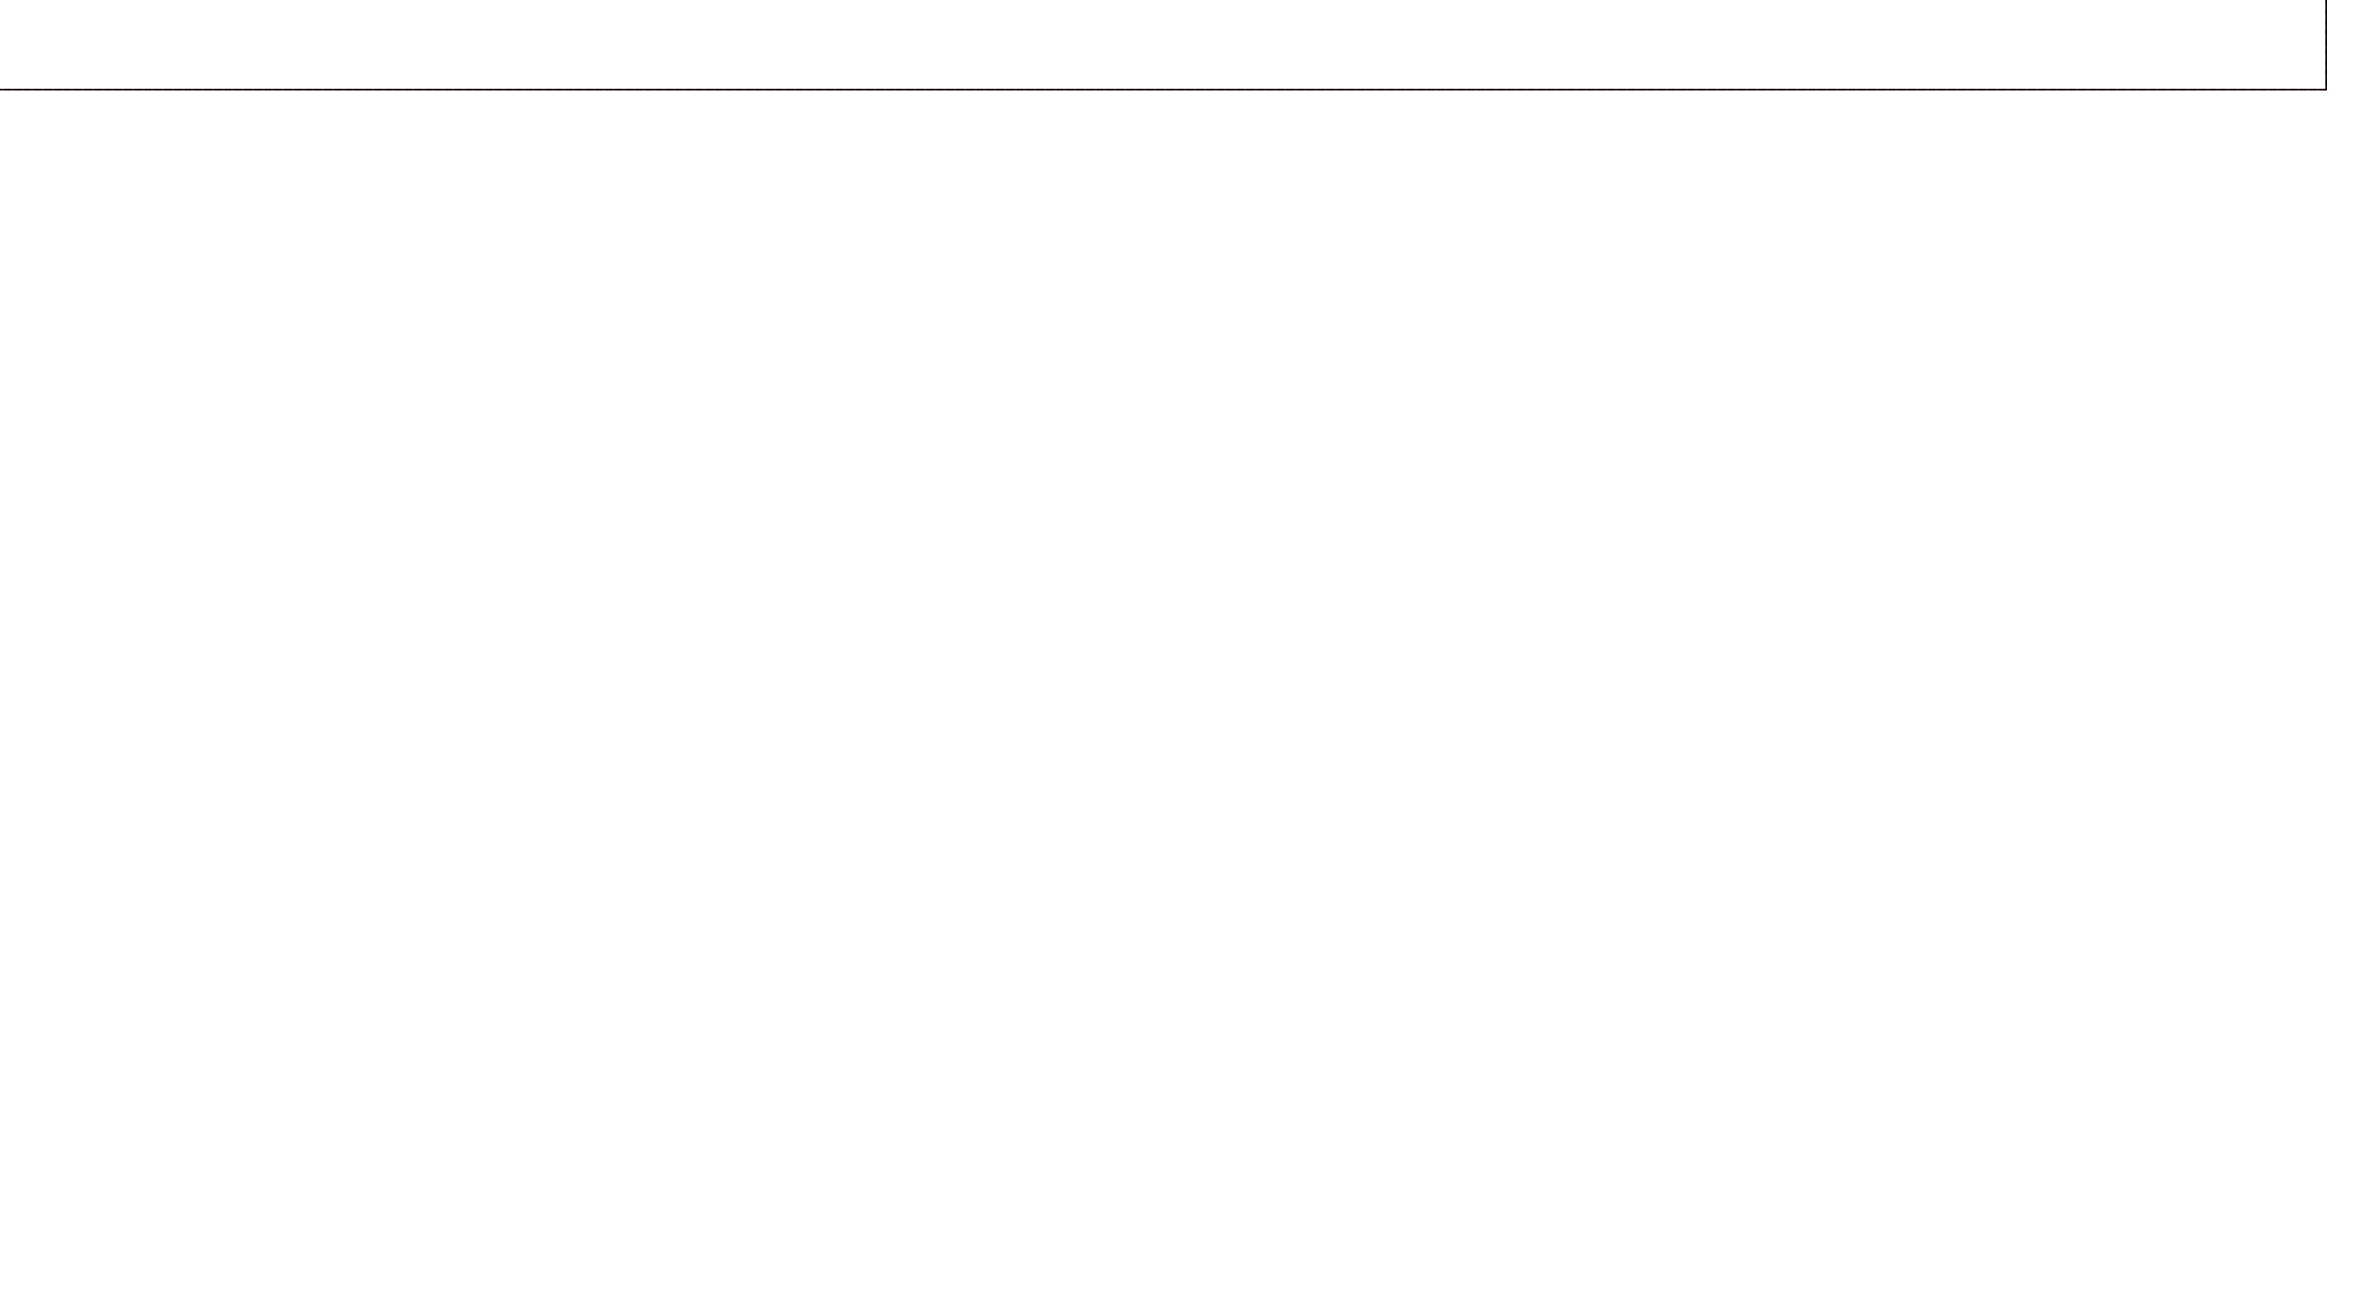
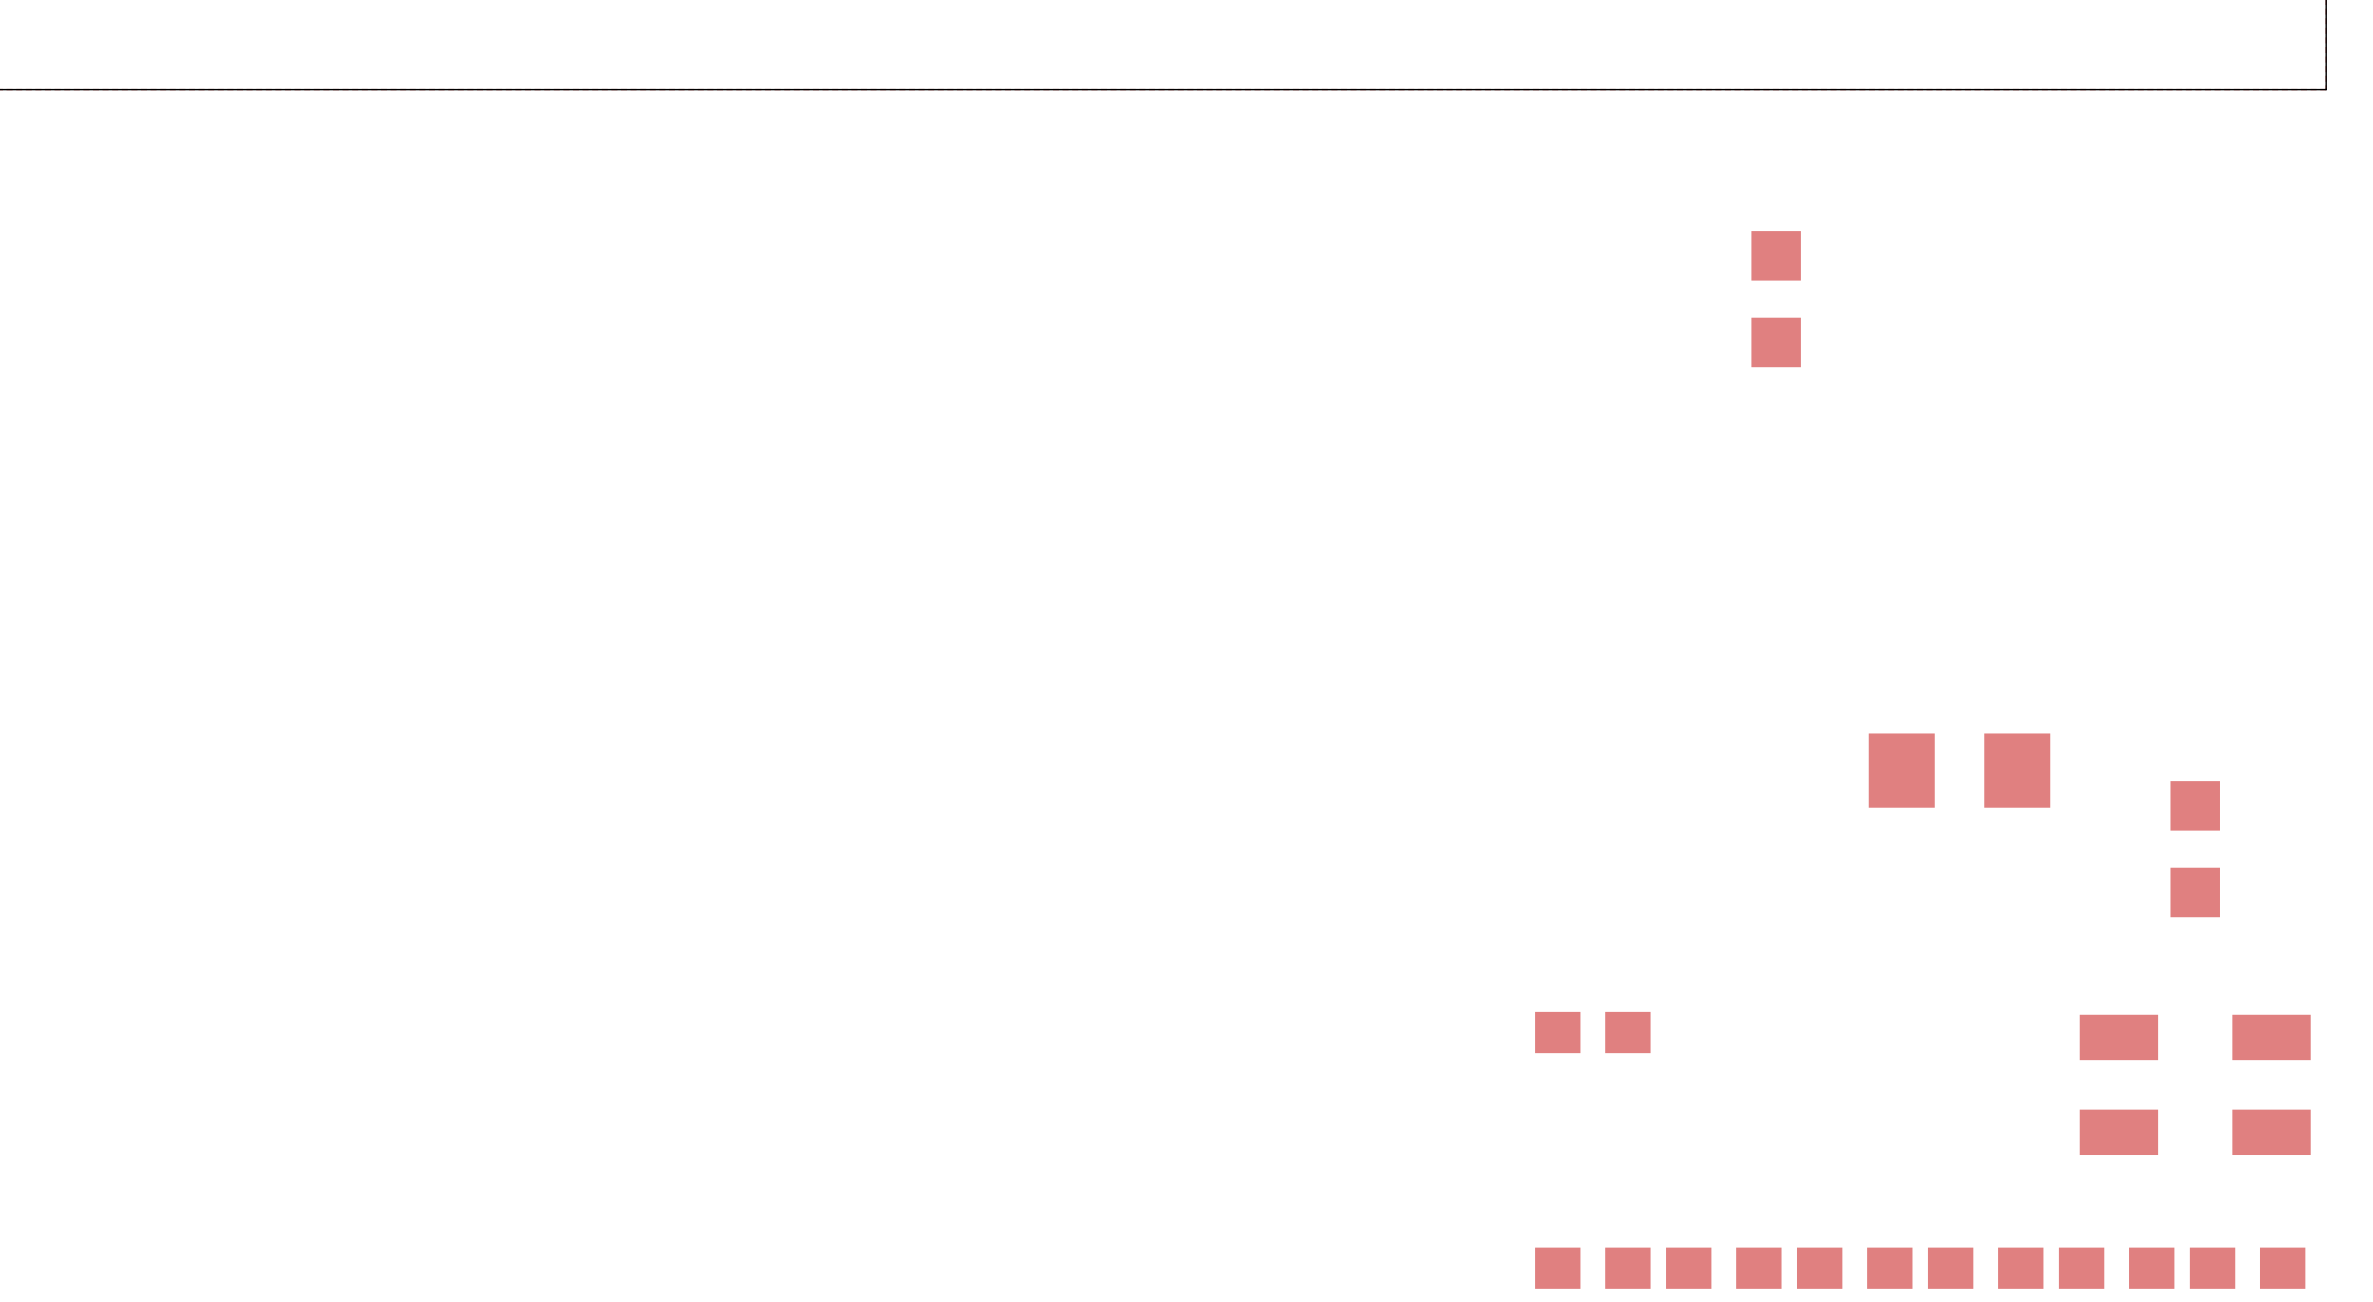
part: none -> (1776, 299)
part: none -> (1959, 770)
part: none -> (2195, 849)
part: none -> (1592, 1032)
part: none -> (2195, 1084)
part: none -> (1592, 1268)
part: none -> (1723, 1268)
part: none -> (1854, 1268)
part: none -> (1985, 1268)
part: none -> (2116, 1268)
part: none -> (2247, 1268)

